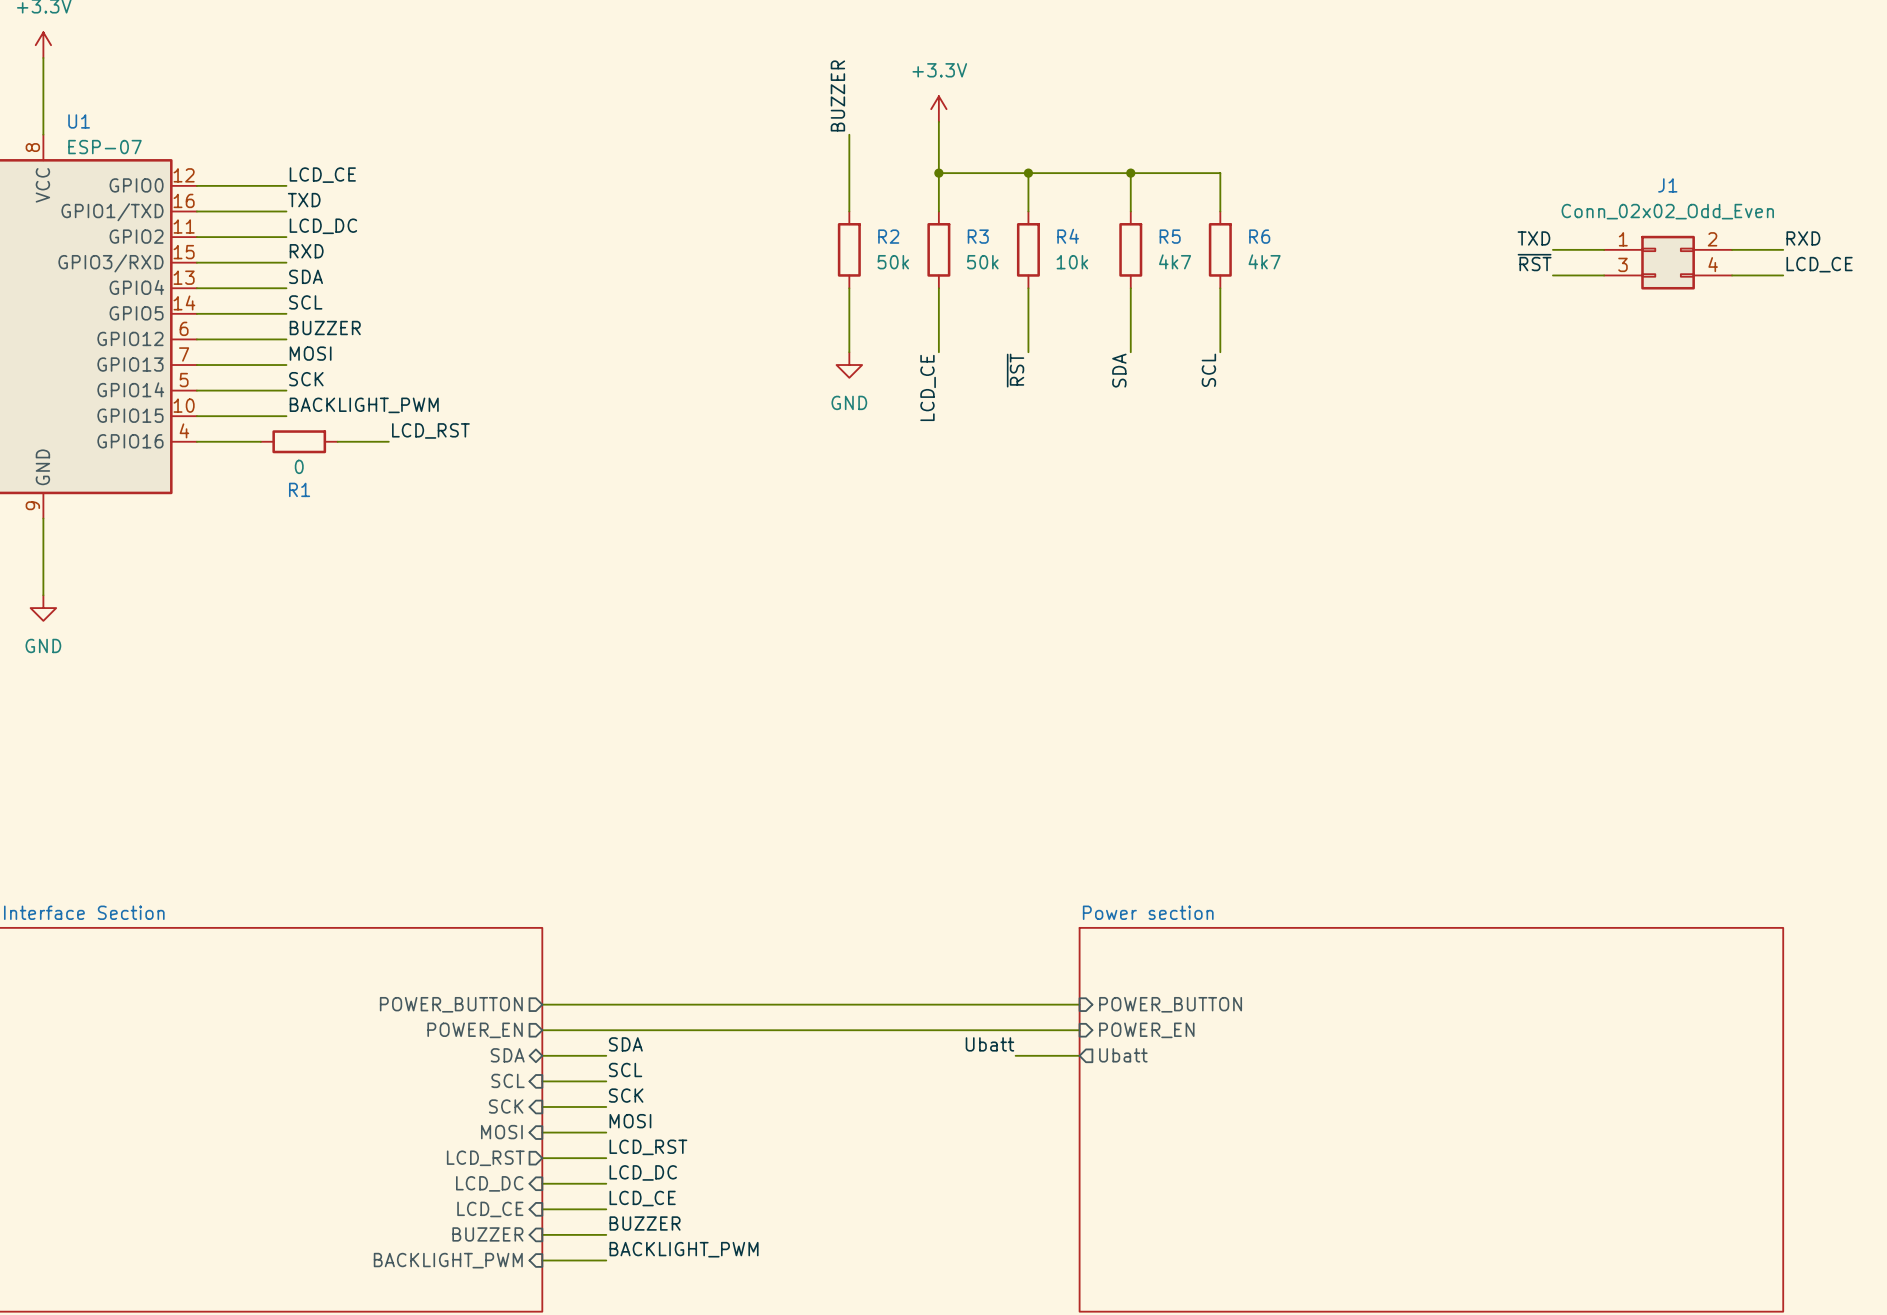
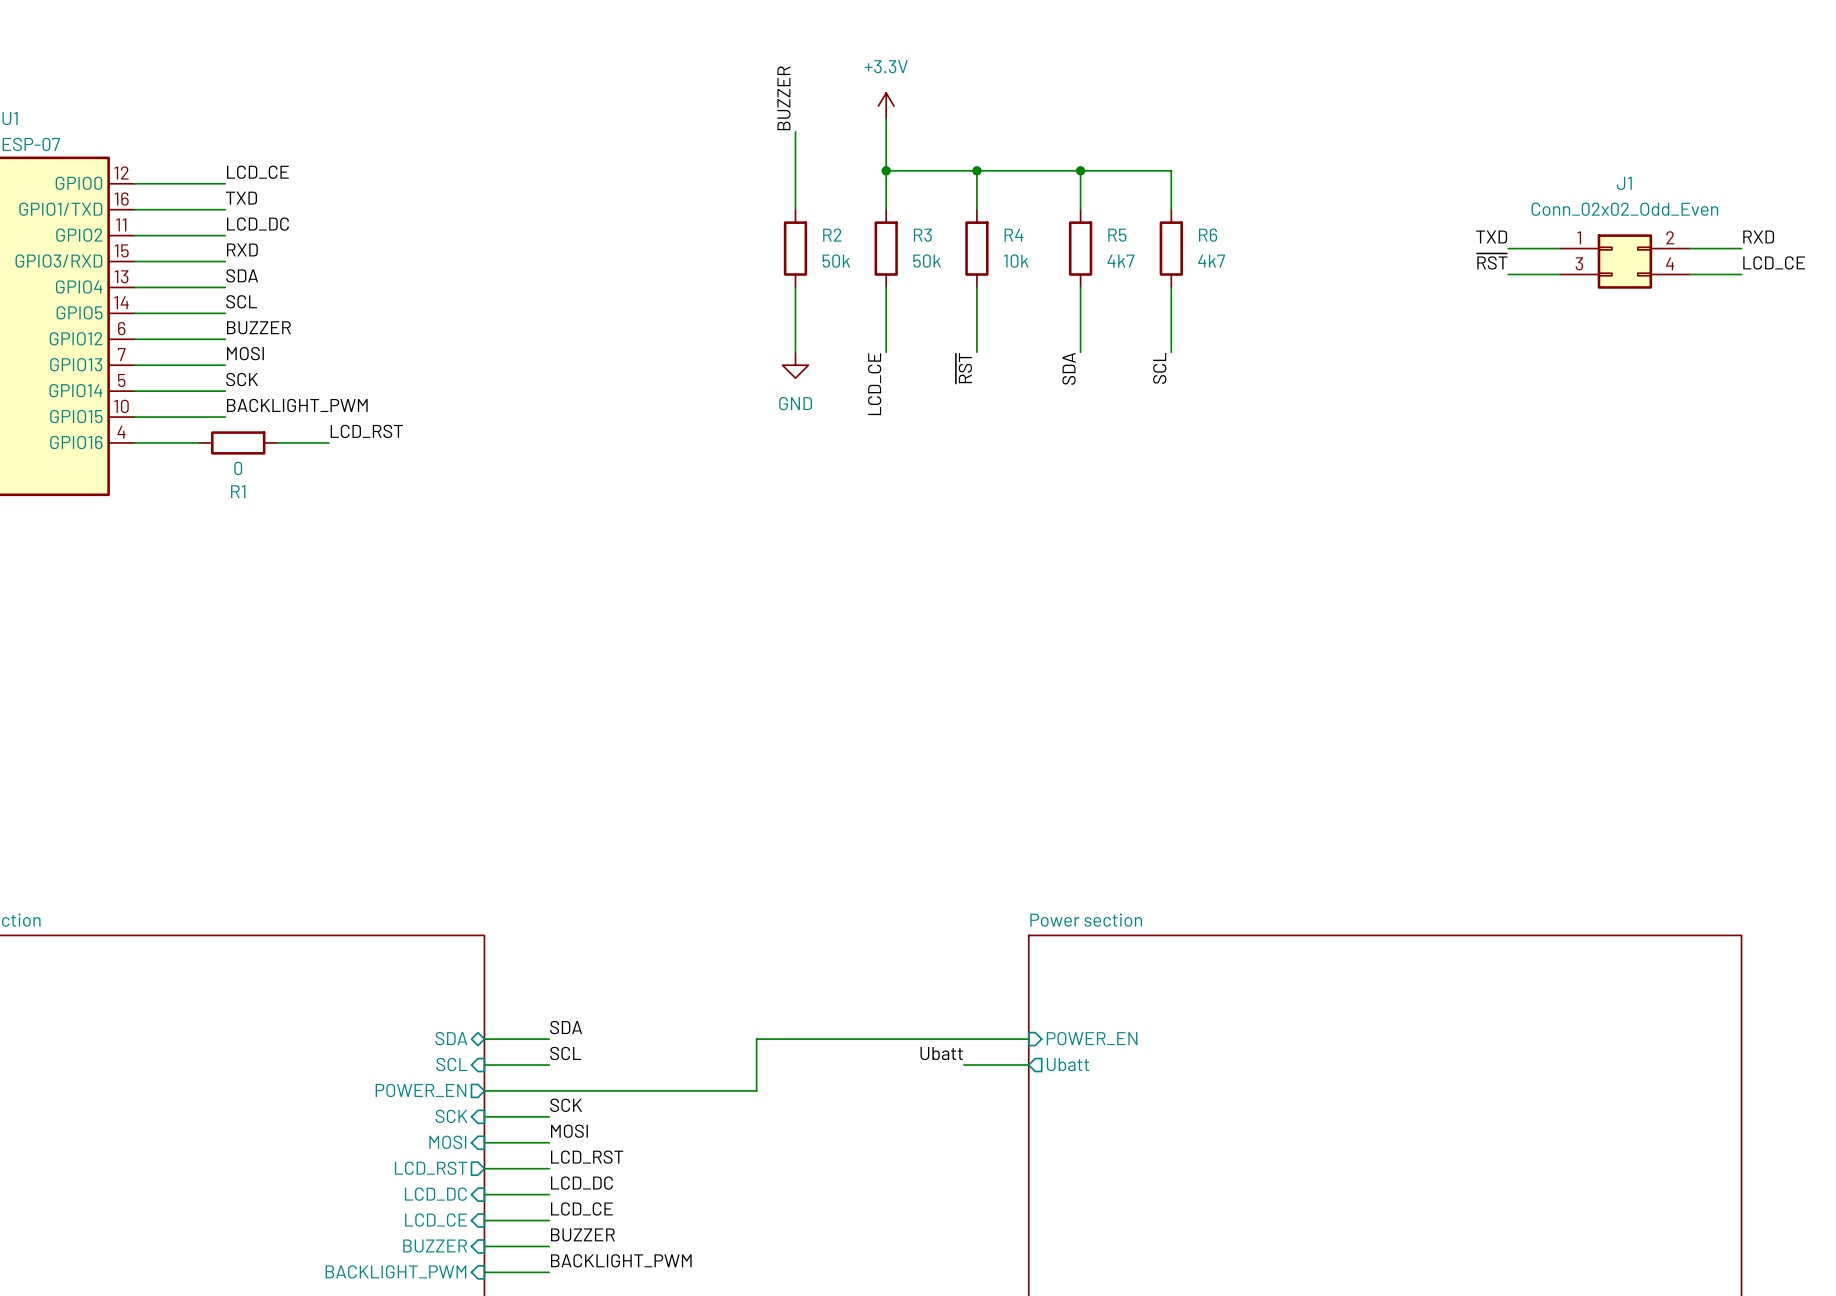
sheet pin: POWER_BUTTON (451, 1004) -> none
wire: (542, 1004) (1079, 1004) -> none
sheet pin: POWER_BUTTON (1170, 1004) -> none
label: none -> SDA (566, 1027)
sheet pin shape: output (475, 1030) -> bidirectional (451, 1038)
sheet pin: POWER_EN (475, 1030) -> SDA (451, 1038)
wire: (606, 1030) (810, 1030) -> (549, 1090) (756, 1090) (756, 1039)
label: SDA (625, 1044) -> SCL (565, 1053)
sheet pin shape: bidirectional (507, 1055) -> input (451, 1064)
sheet pin: SDA (507, 1055) -> SCL (451, 1064)
label: SCL (625, 1069) -> none
sheet pin shape: input (507, 1080) -> output (420, 1090)
sheet pin: SCL (507, 1080) -> POWER_EN (420, 1090)

